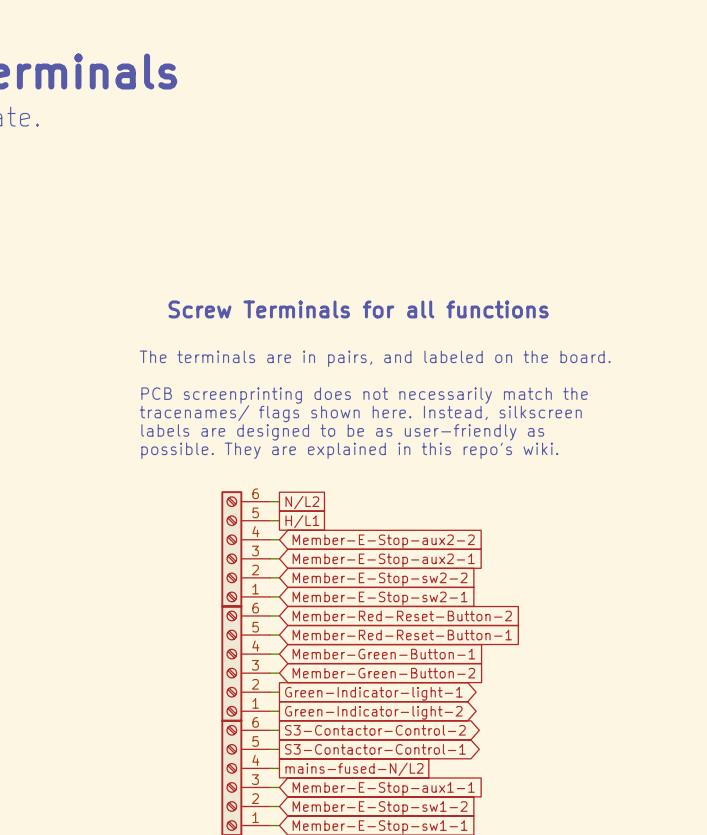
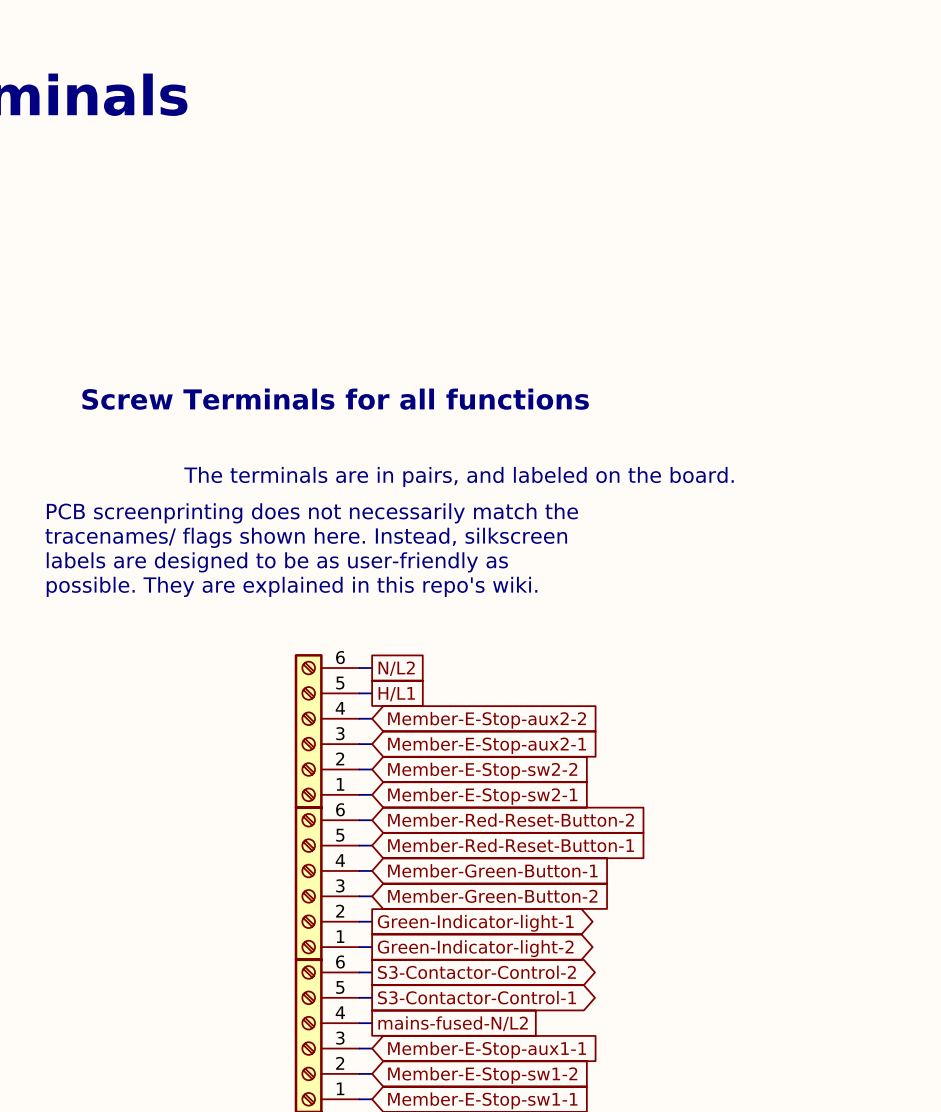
text position: Screw Terminals for all functions (358, 309) -> Screw Terminals for all functions (335, 399)
text position: PCB screenprinting does not necessarily match the (364, 395) -> PCB screenprinting does not necessarily match the (312, 513)
text position: tracenames/ flags shown here. Instead, silkscreen (360, 413) -> tracenames/ flags shown here. Instead, silkscreen (306, 537)
text position: labels are designed to be as user-friendly as (342, 432) -> labels are designed to be as user-friendly as (277, 562)
text position: possible. They are explained in this repo's wiki. (349, 450) -> possible. They are explained in this repo's wiki. (292, 586)

